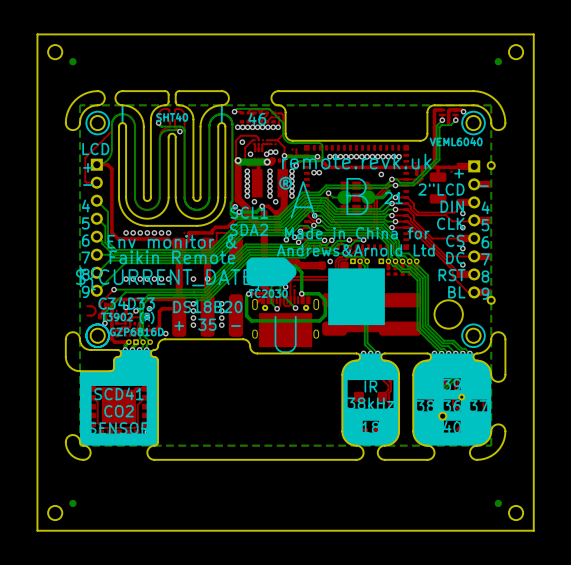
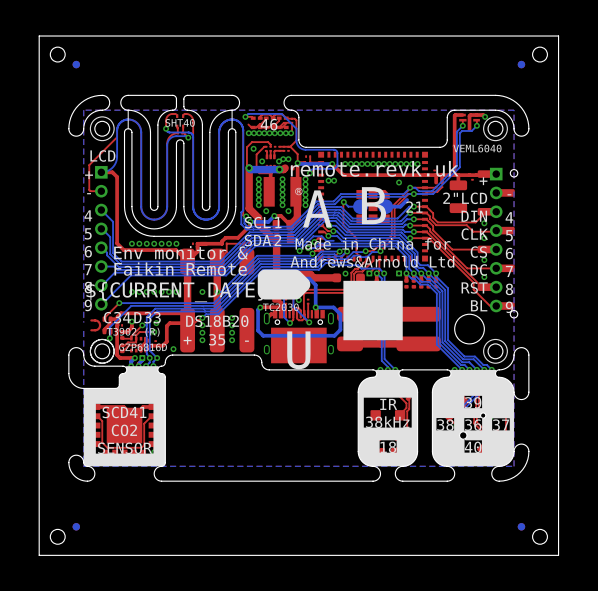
top track: none -> (285, 123) (282, 127) (276, 127) (272, 123) (269, 127) (263, 127) (259, 123) (256, 127) (251, 127) (248, 124)

